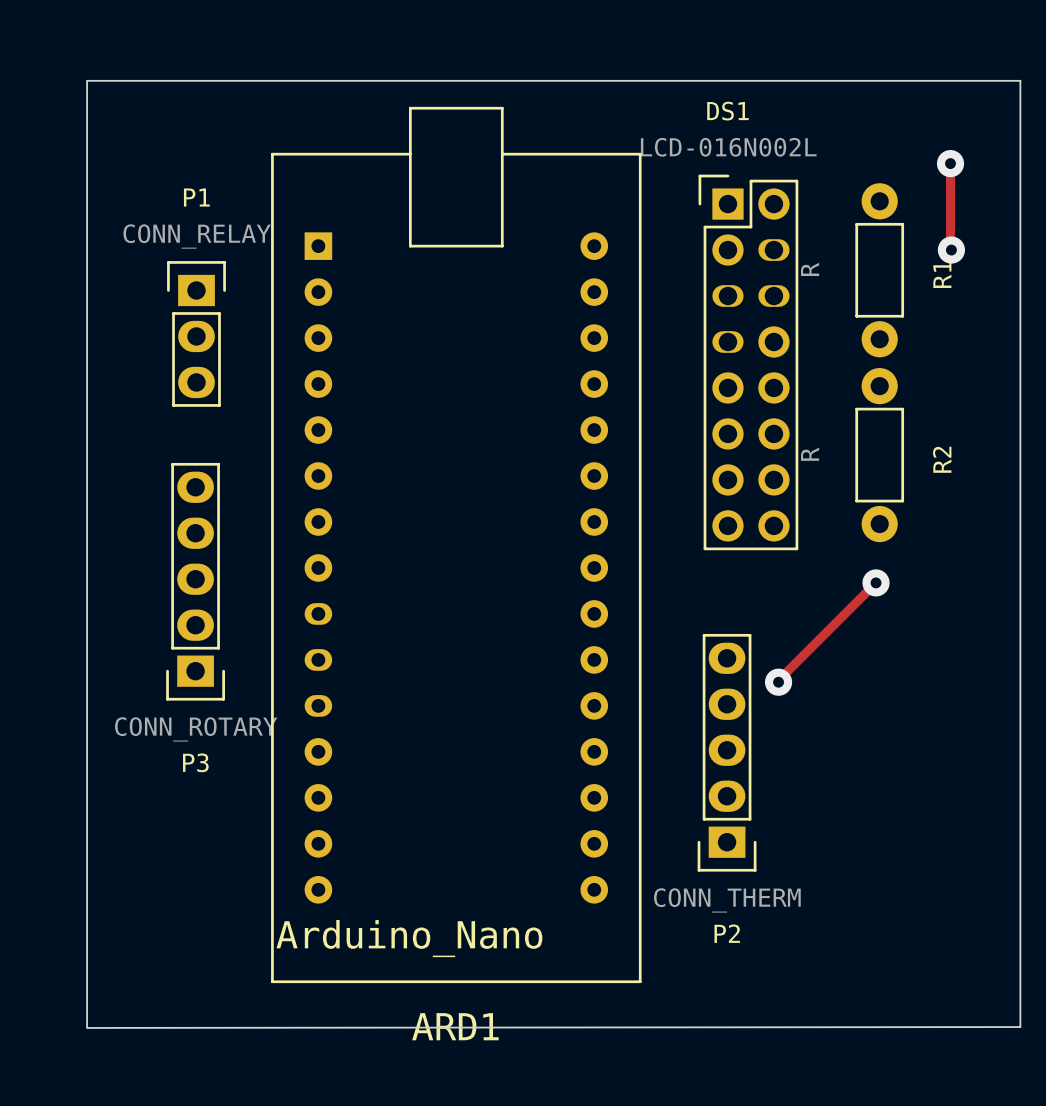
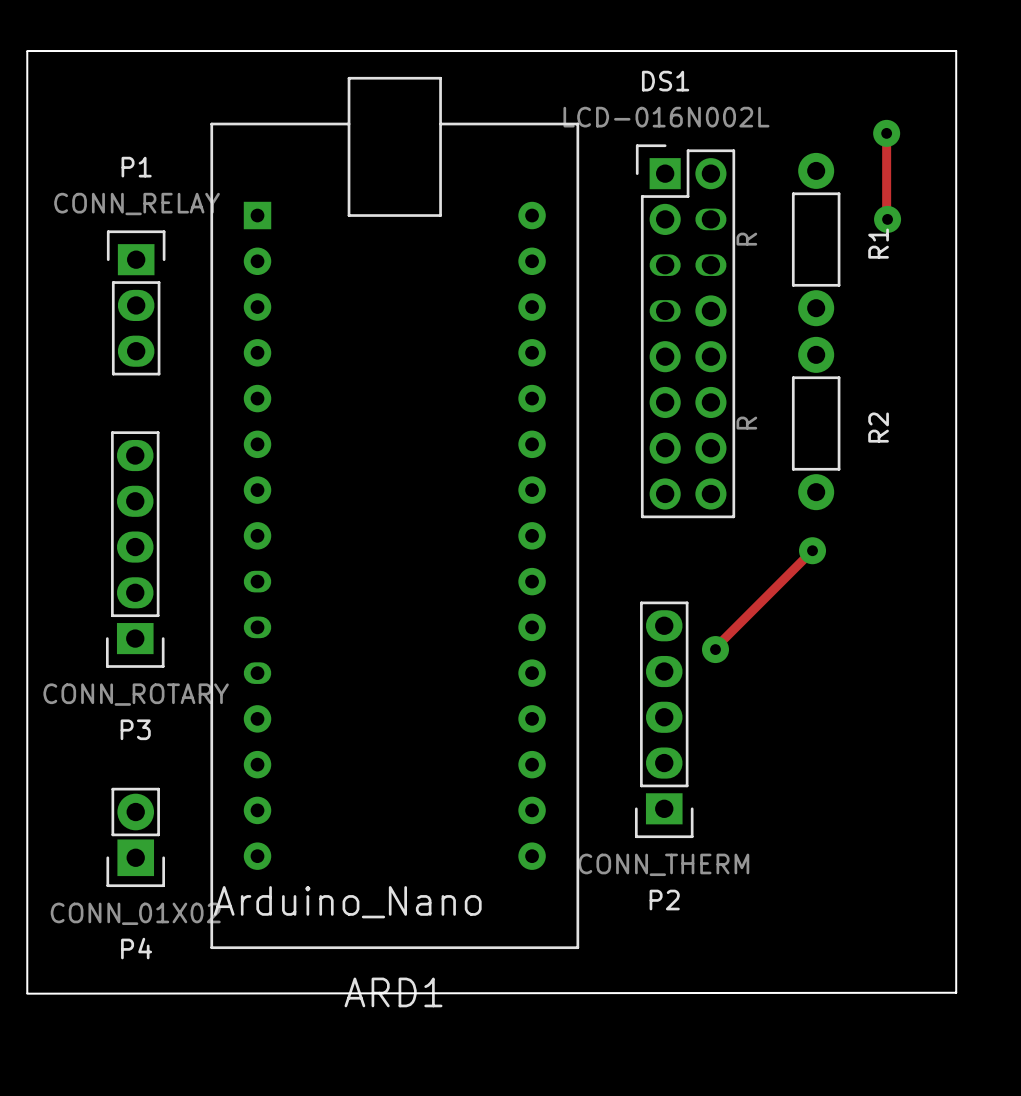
P4: none -> CONN_01X02 (135, 837)

